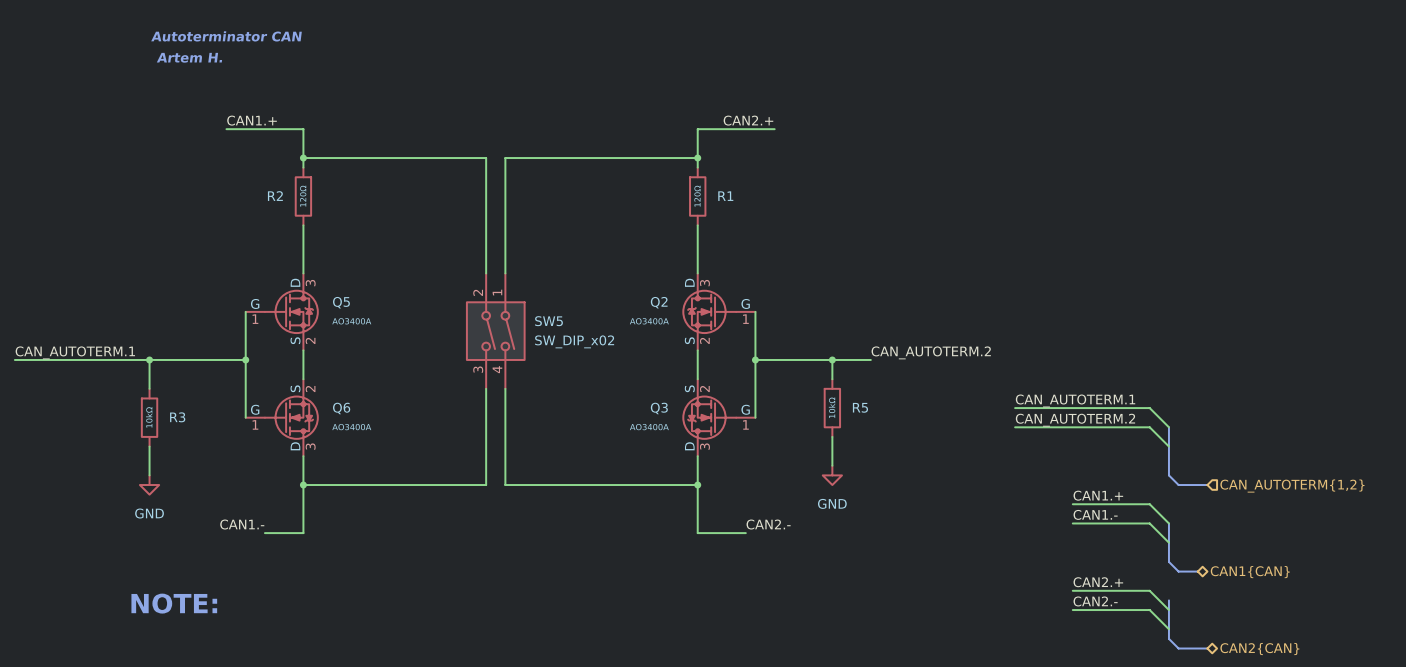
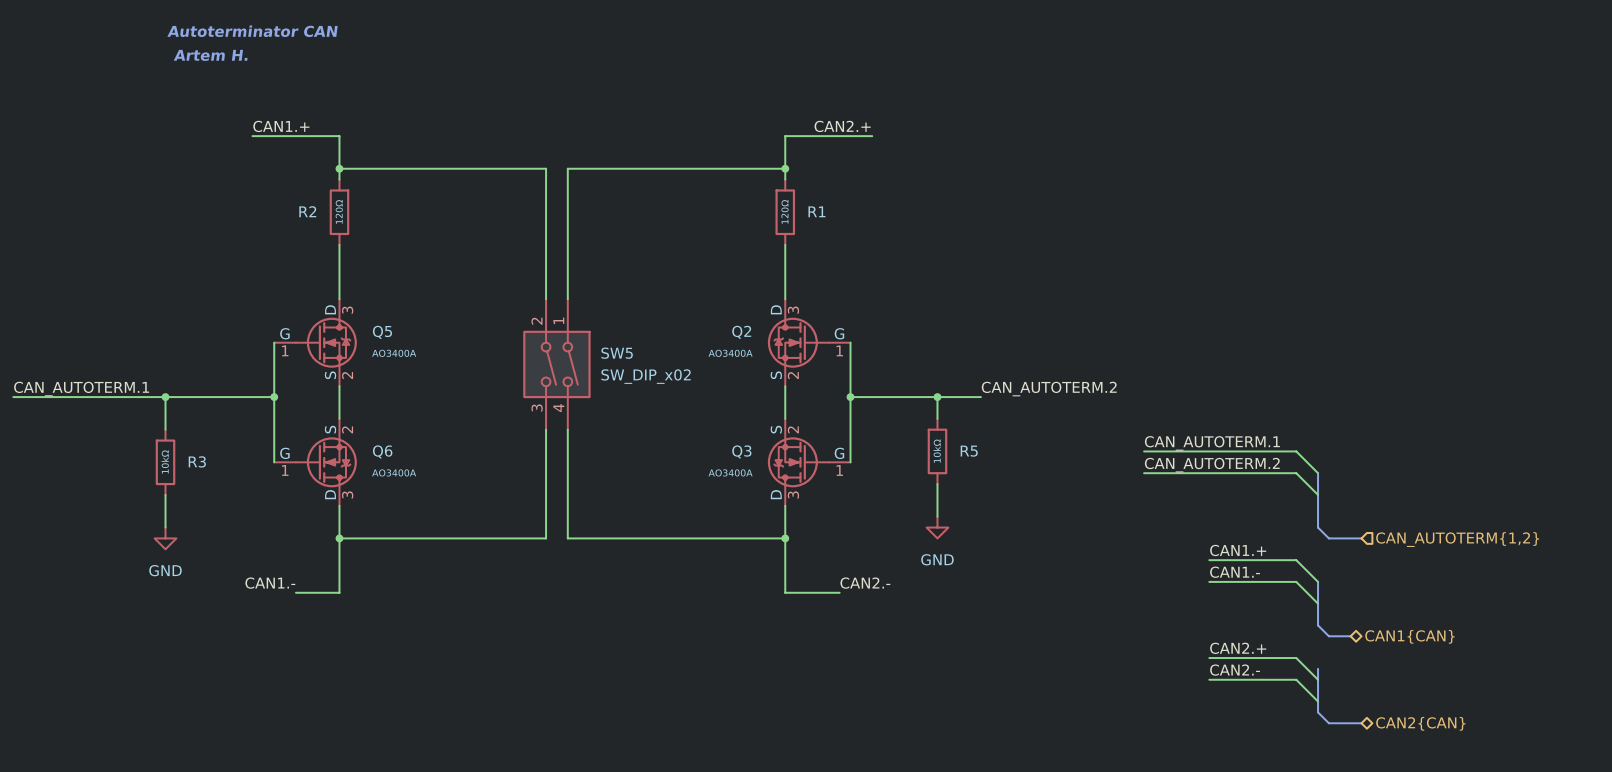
text: NOTE: (174, 603) -> none

